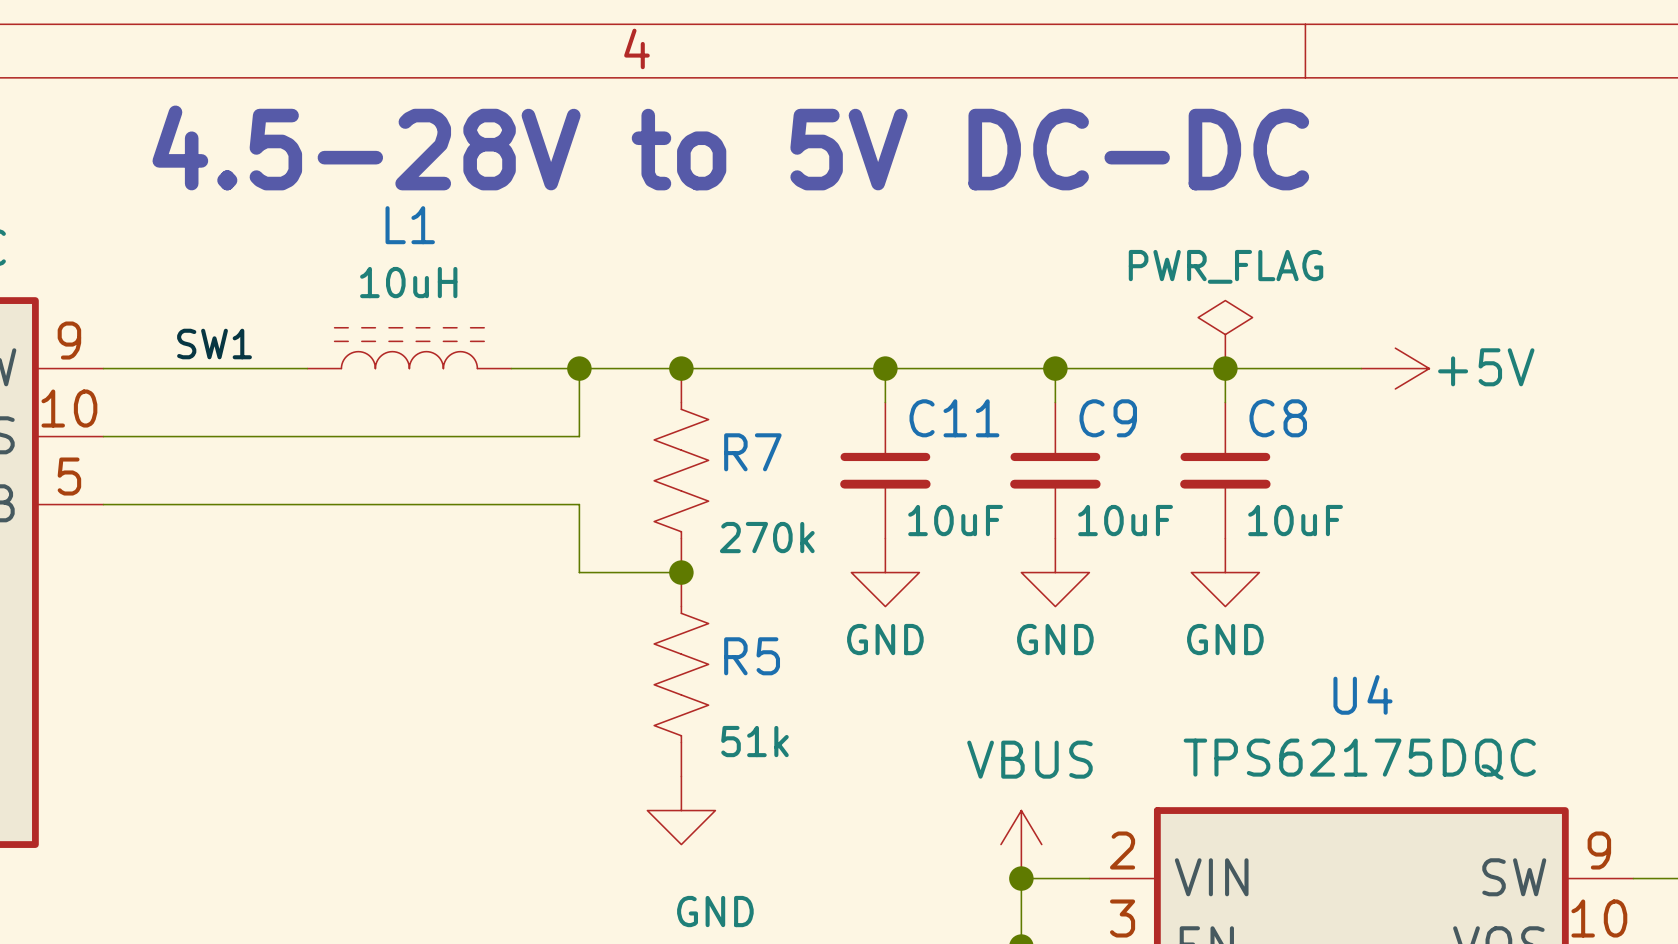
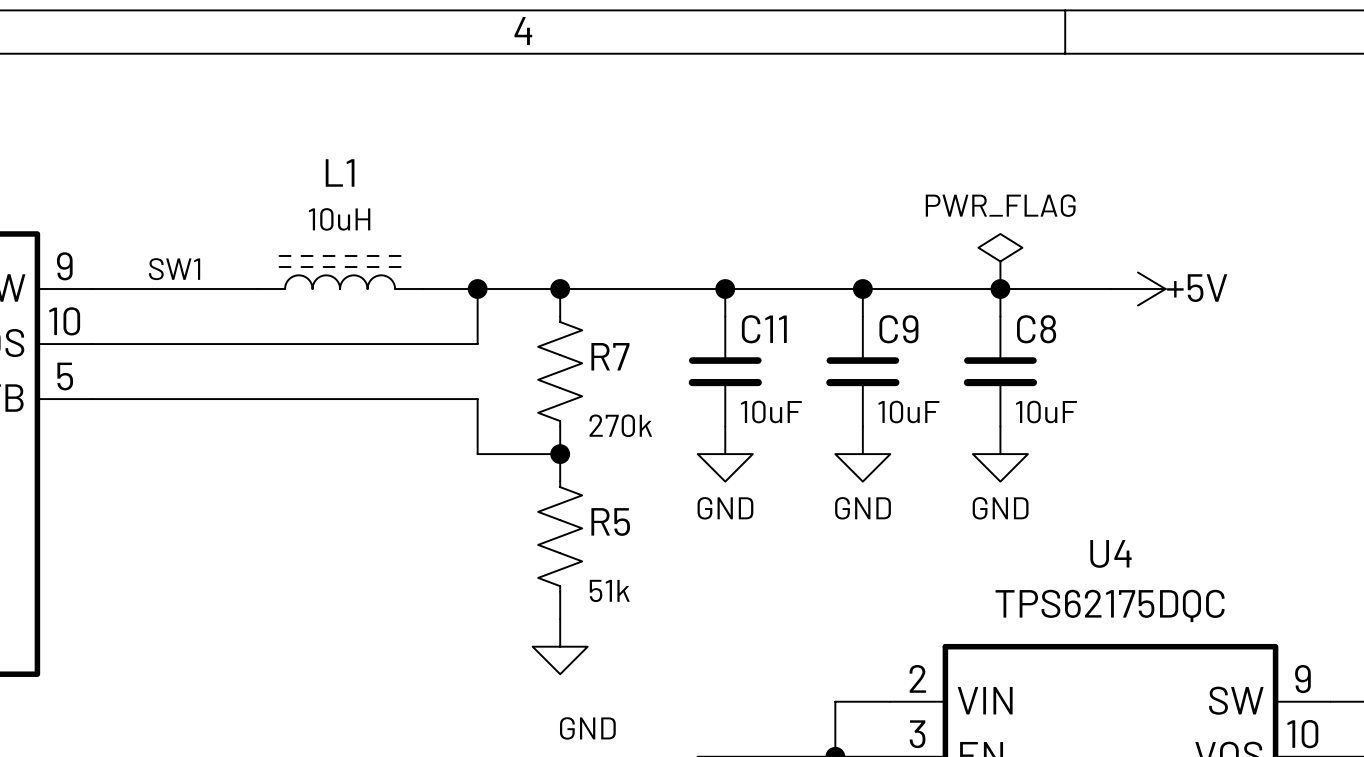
text: 4.5-28V to 5V DC-DC (730, 147) -> none
power symbol: VBUS (1021, 844) -> none
junction: (1021, 878) -> none

